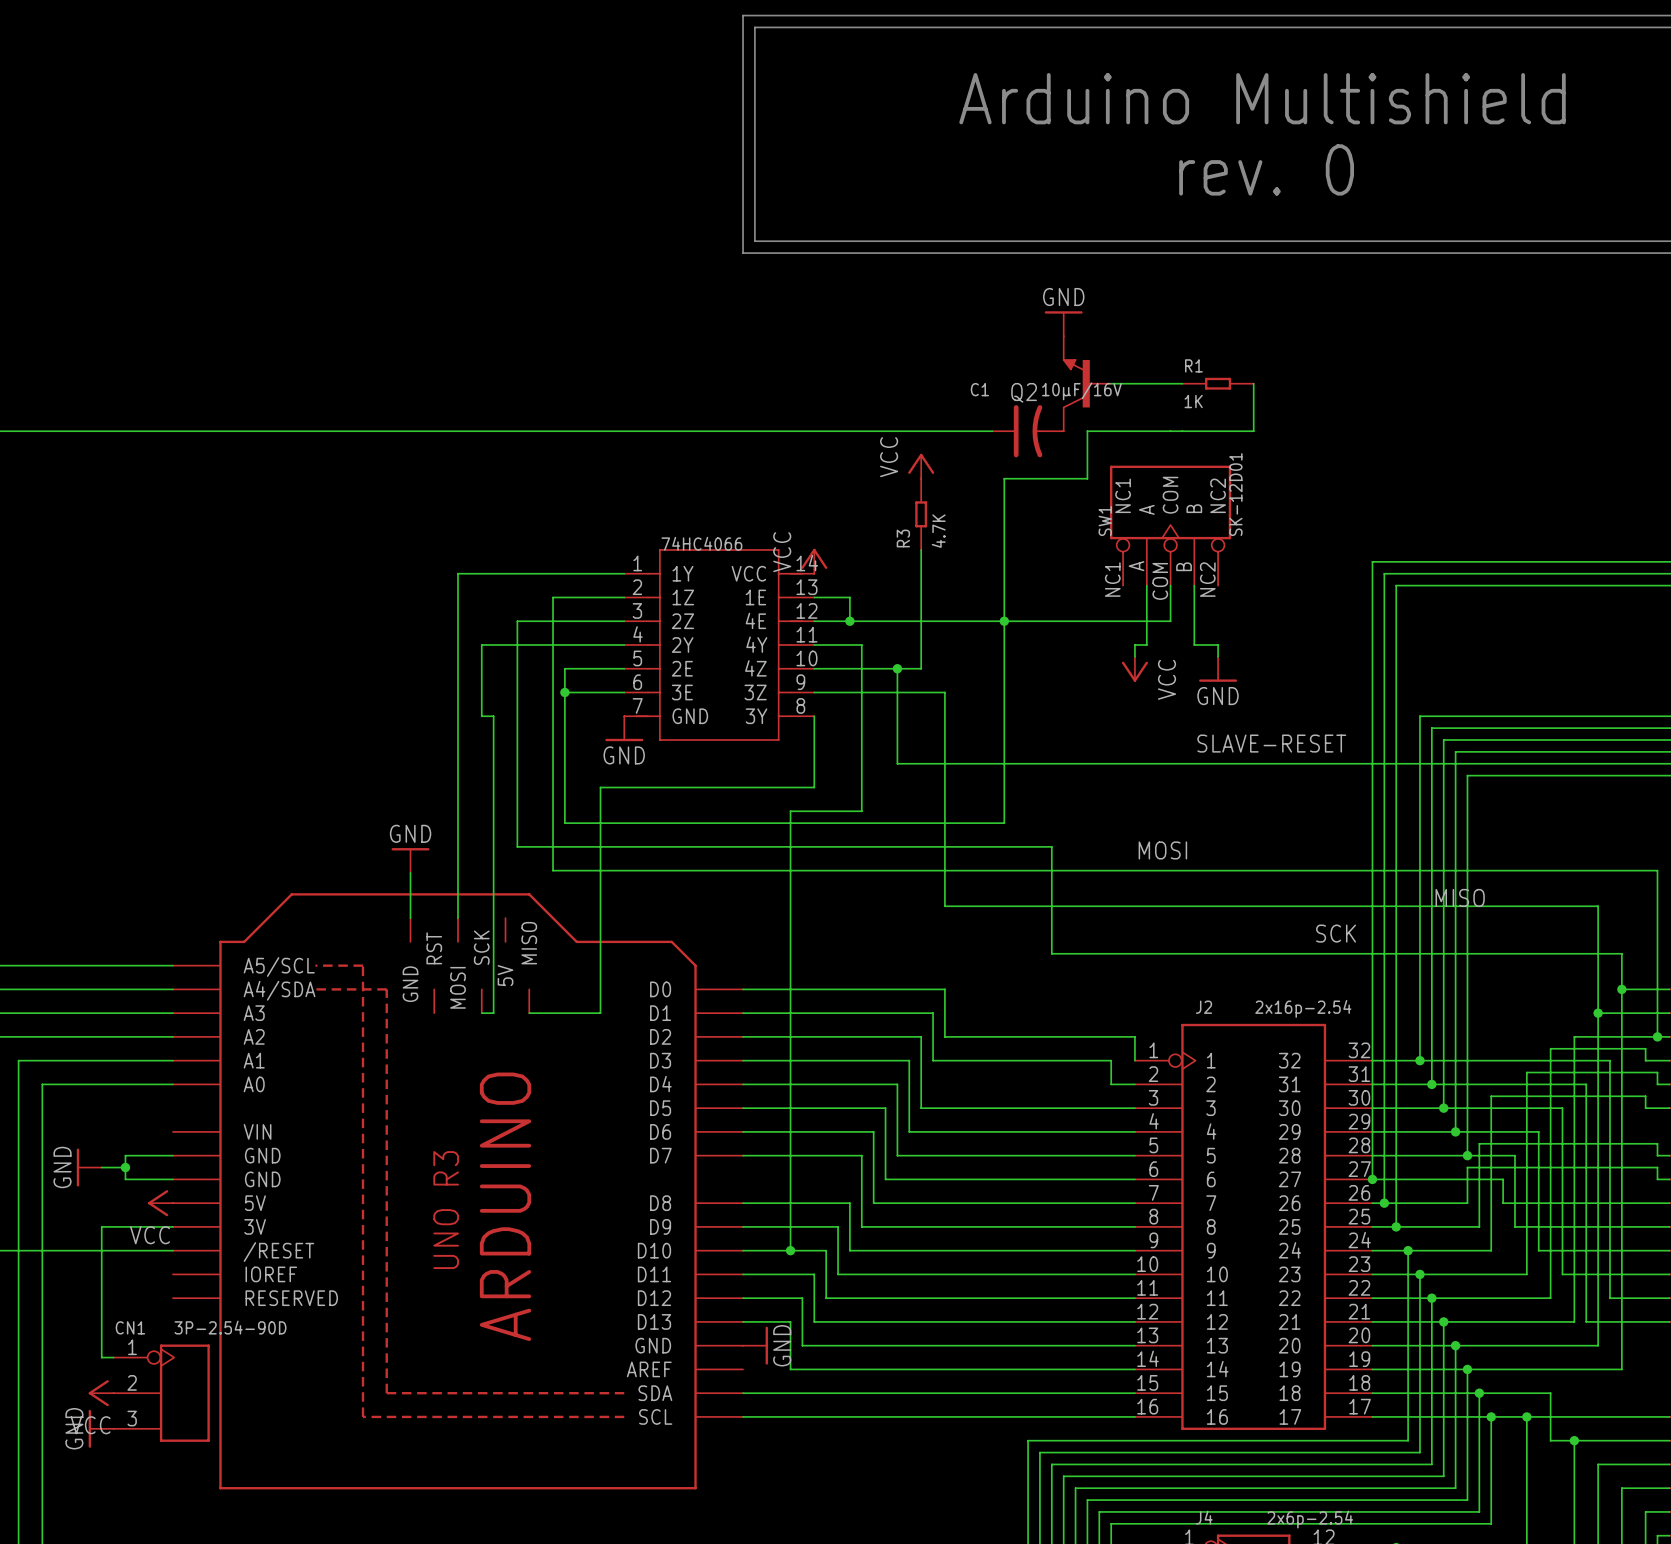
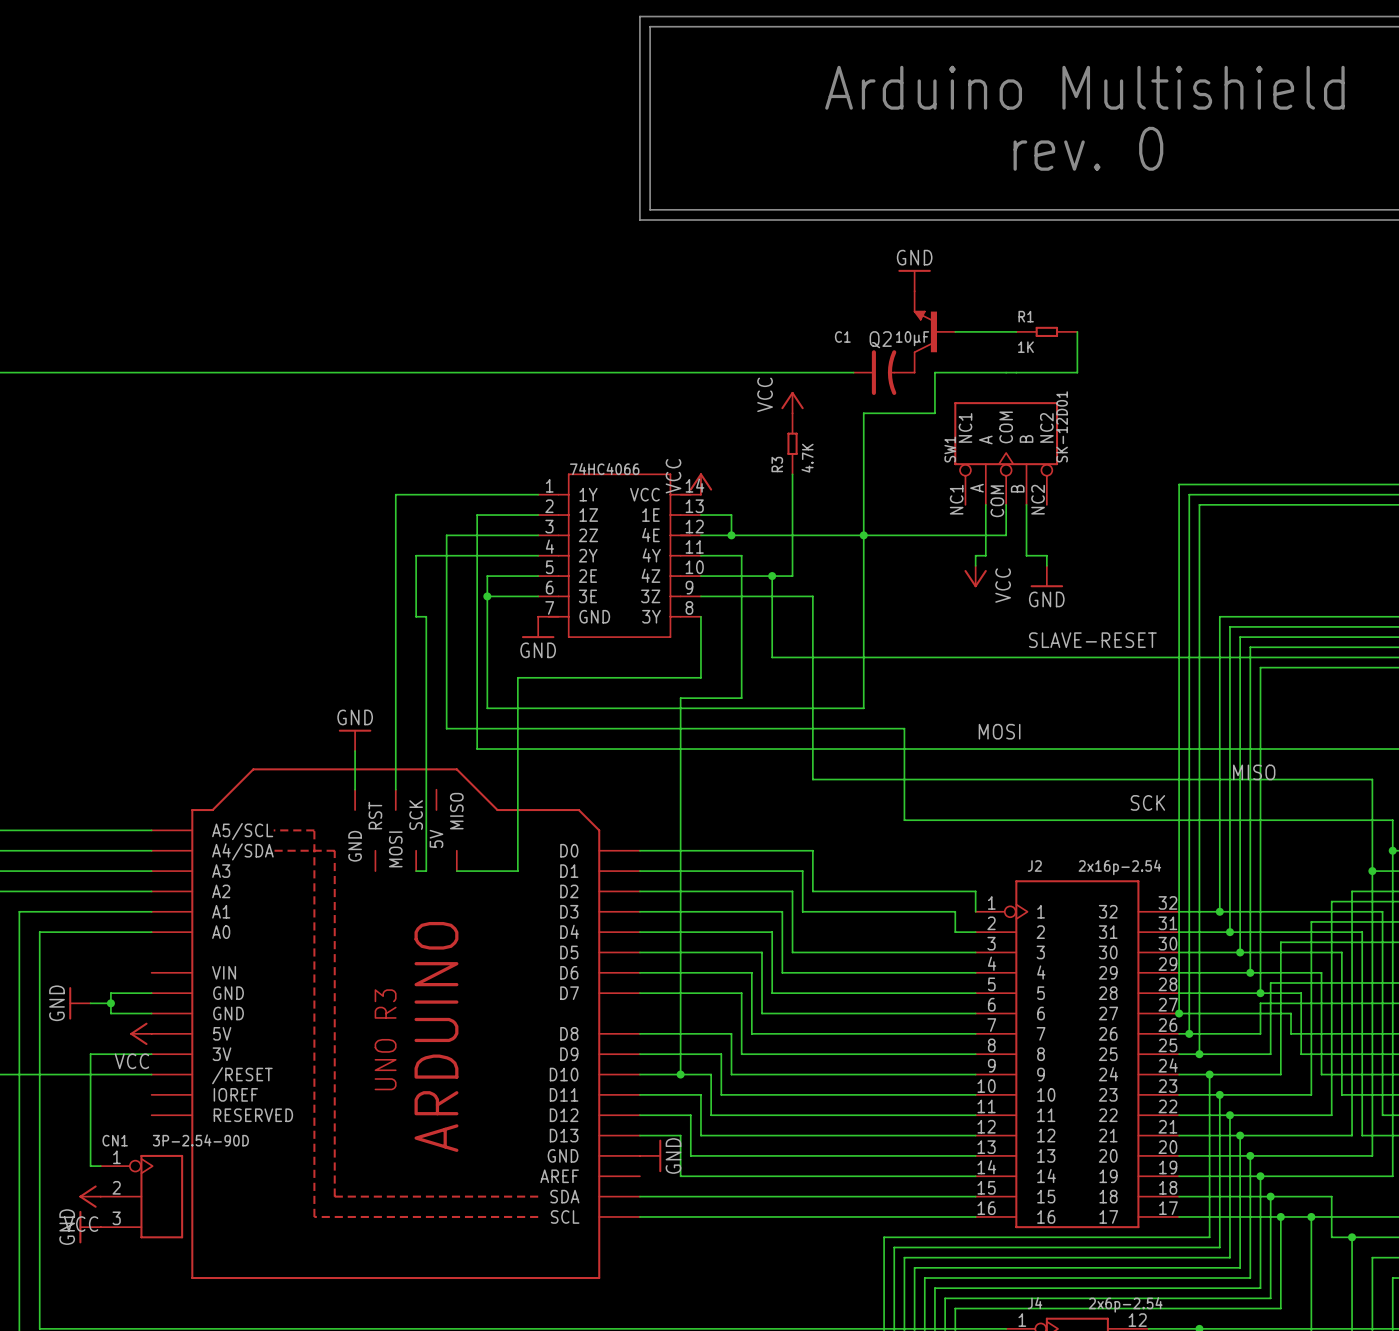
C1 value: 10µF/16V (1081, 391) -> 10µF (912, 338)

